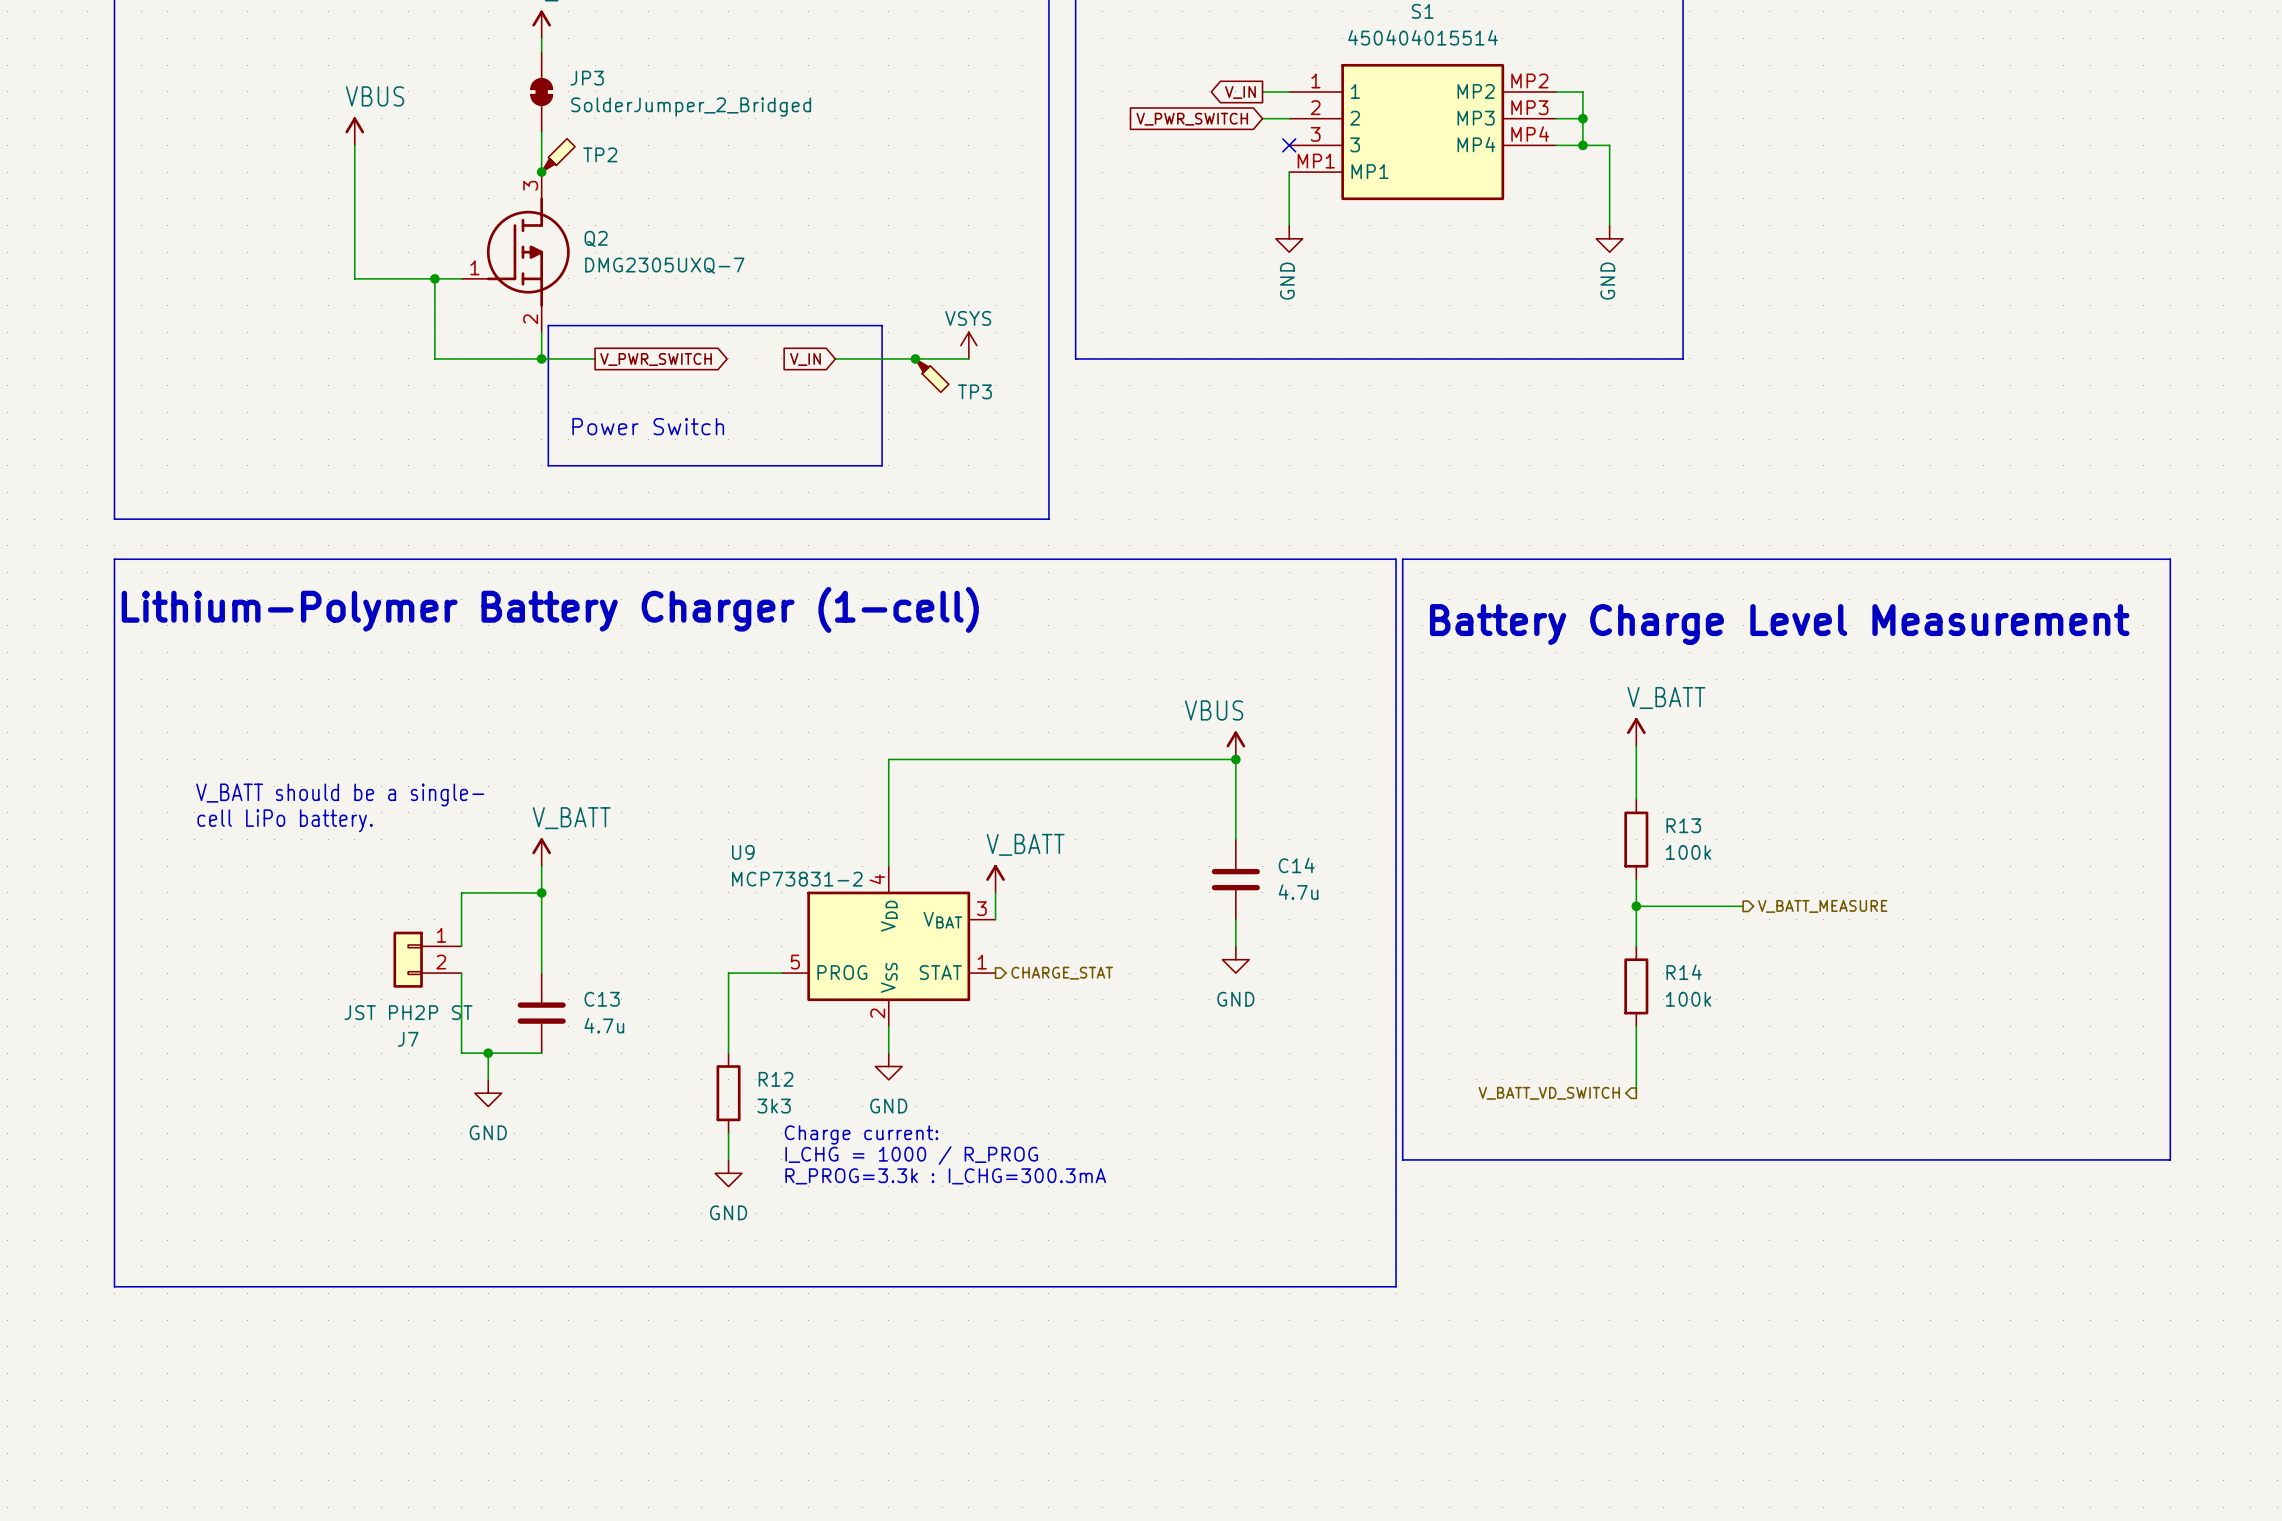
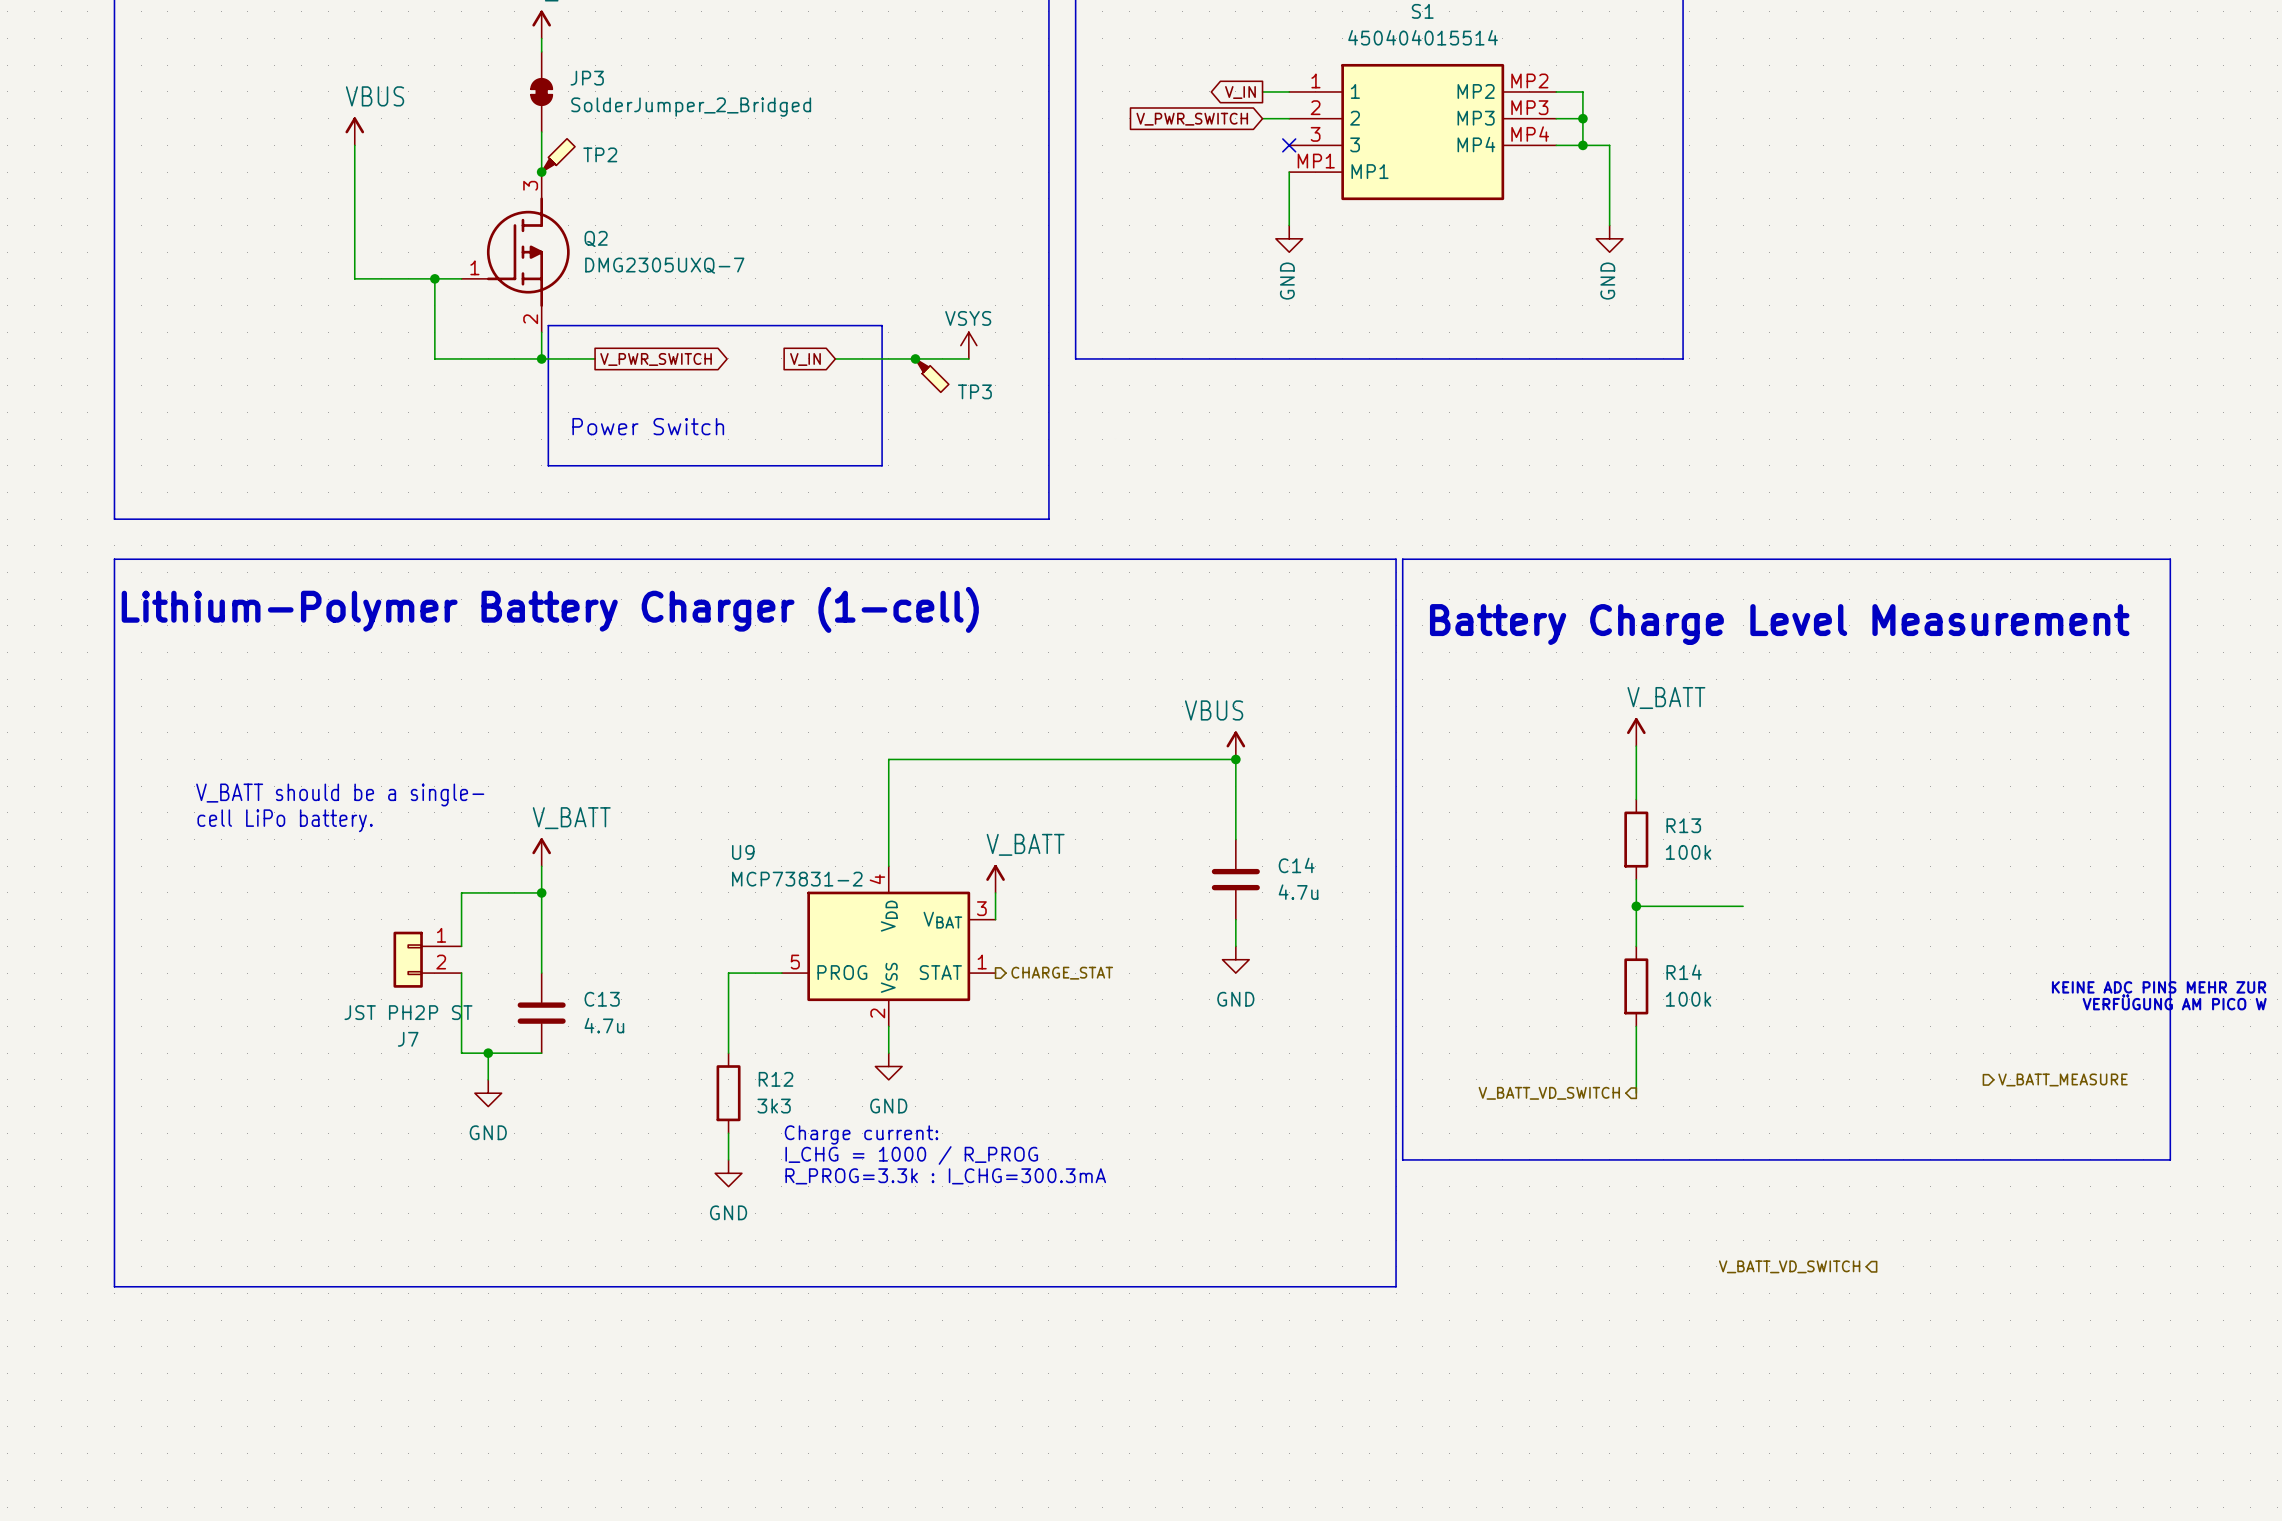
hierarchical label: V_BATT_MEASURE (1822, 906) -> none
text: none -> KEINE ADC PINS MEHR ZUR (2159, 987)
text: none -> VERFÜGUNG AM PICO W (2174, 1002)
hierarchical label: none -> V_BATT_MEASURE (2063, 1079)
hierarchical label: none -> V_BATT_VD_SWITCH (1789, 1266)

